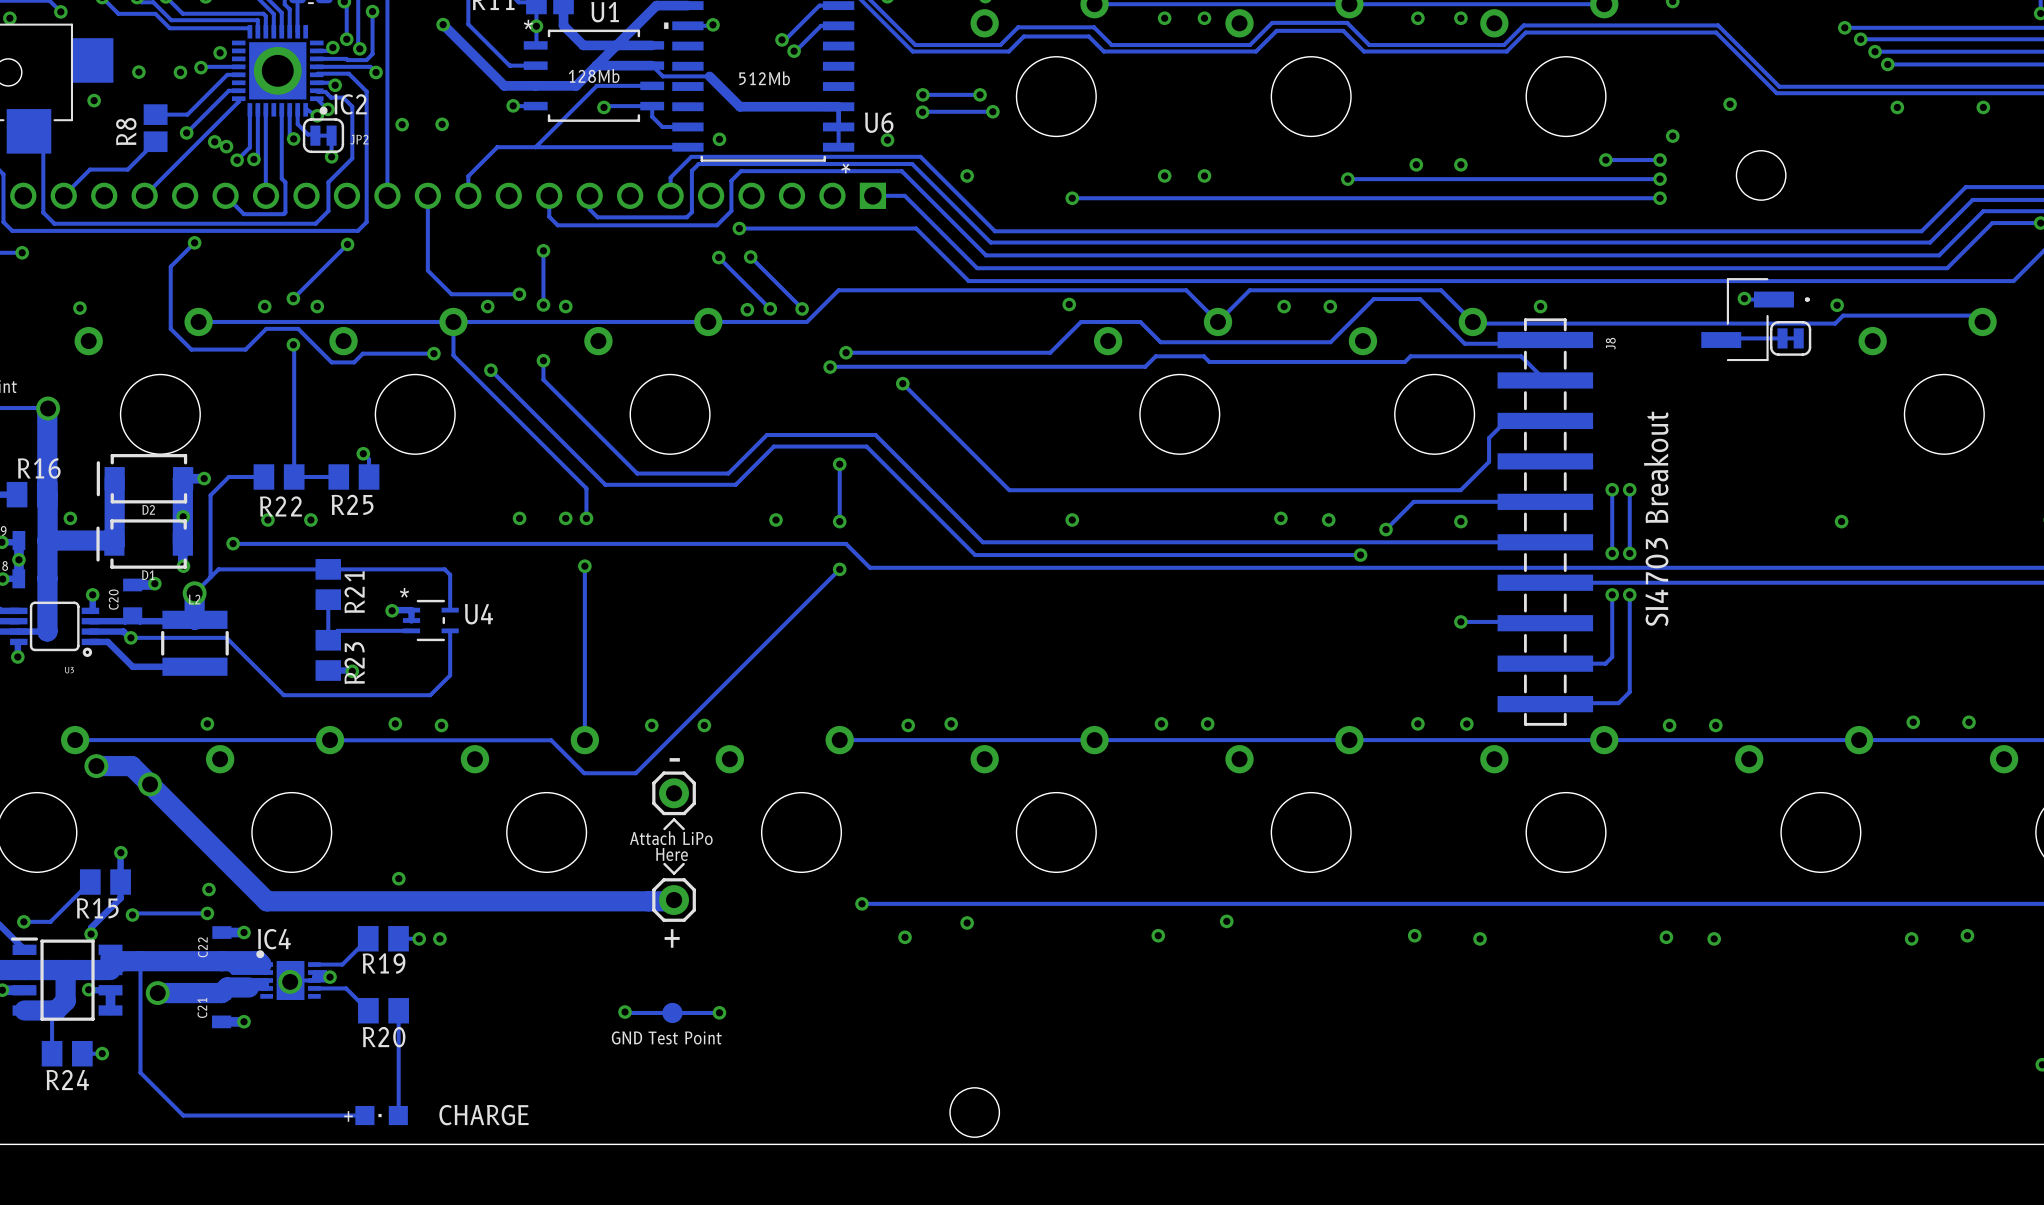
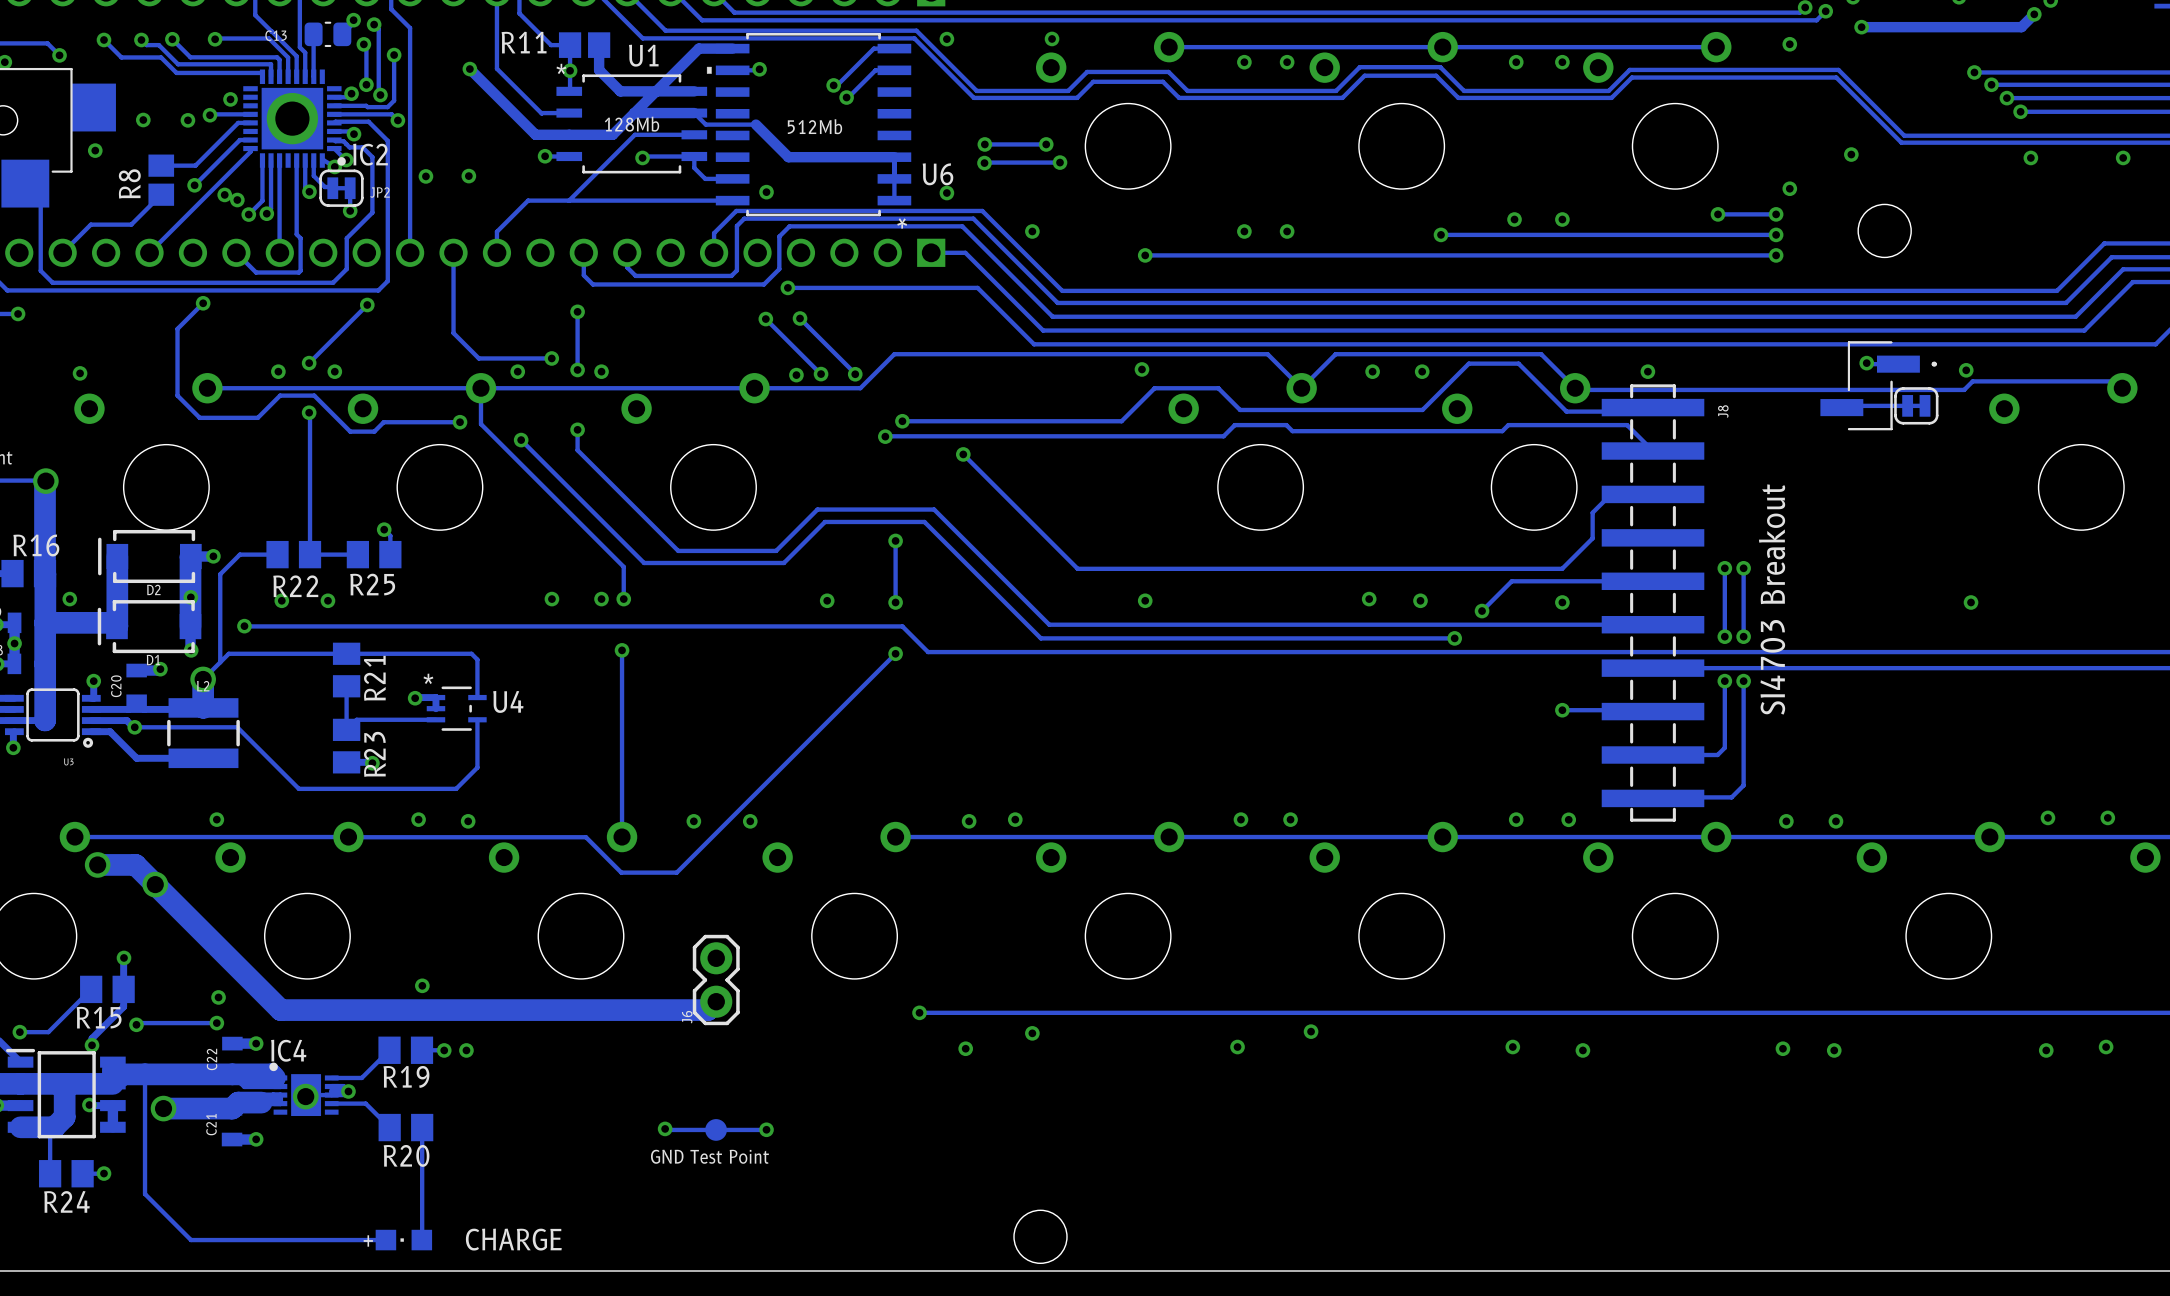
text: - (674, 759) -> none
part: (674, 793) -> none
line: (683, 829) (674, 819) (664, 829) -> none
text: Attach LiPo (671, 838) -> none
text: Here (671, 854) -> none
line: (683, 864) (674, 873) (664, 864) -> none
J6: none -> (716, 980)
part: (674, 900) -> none
text: + (672, 938) -> none

